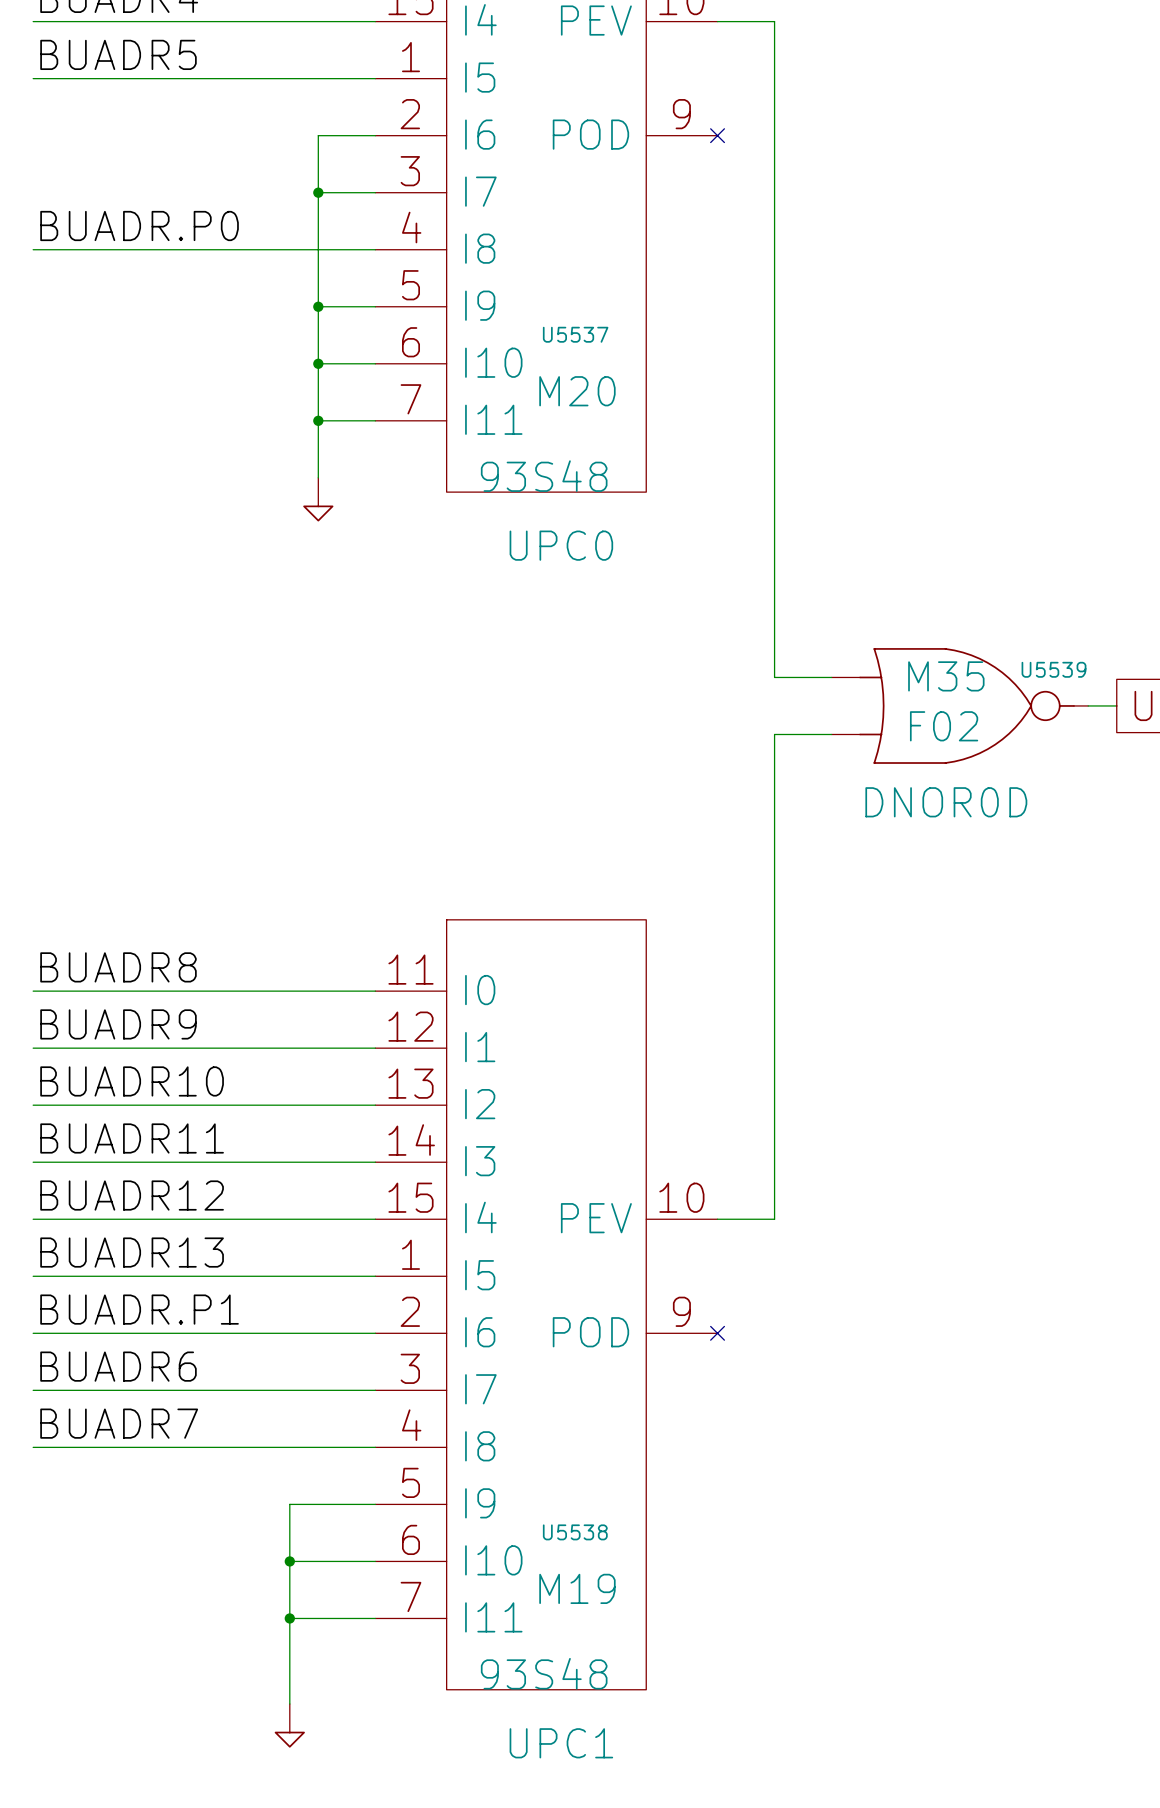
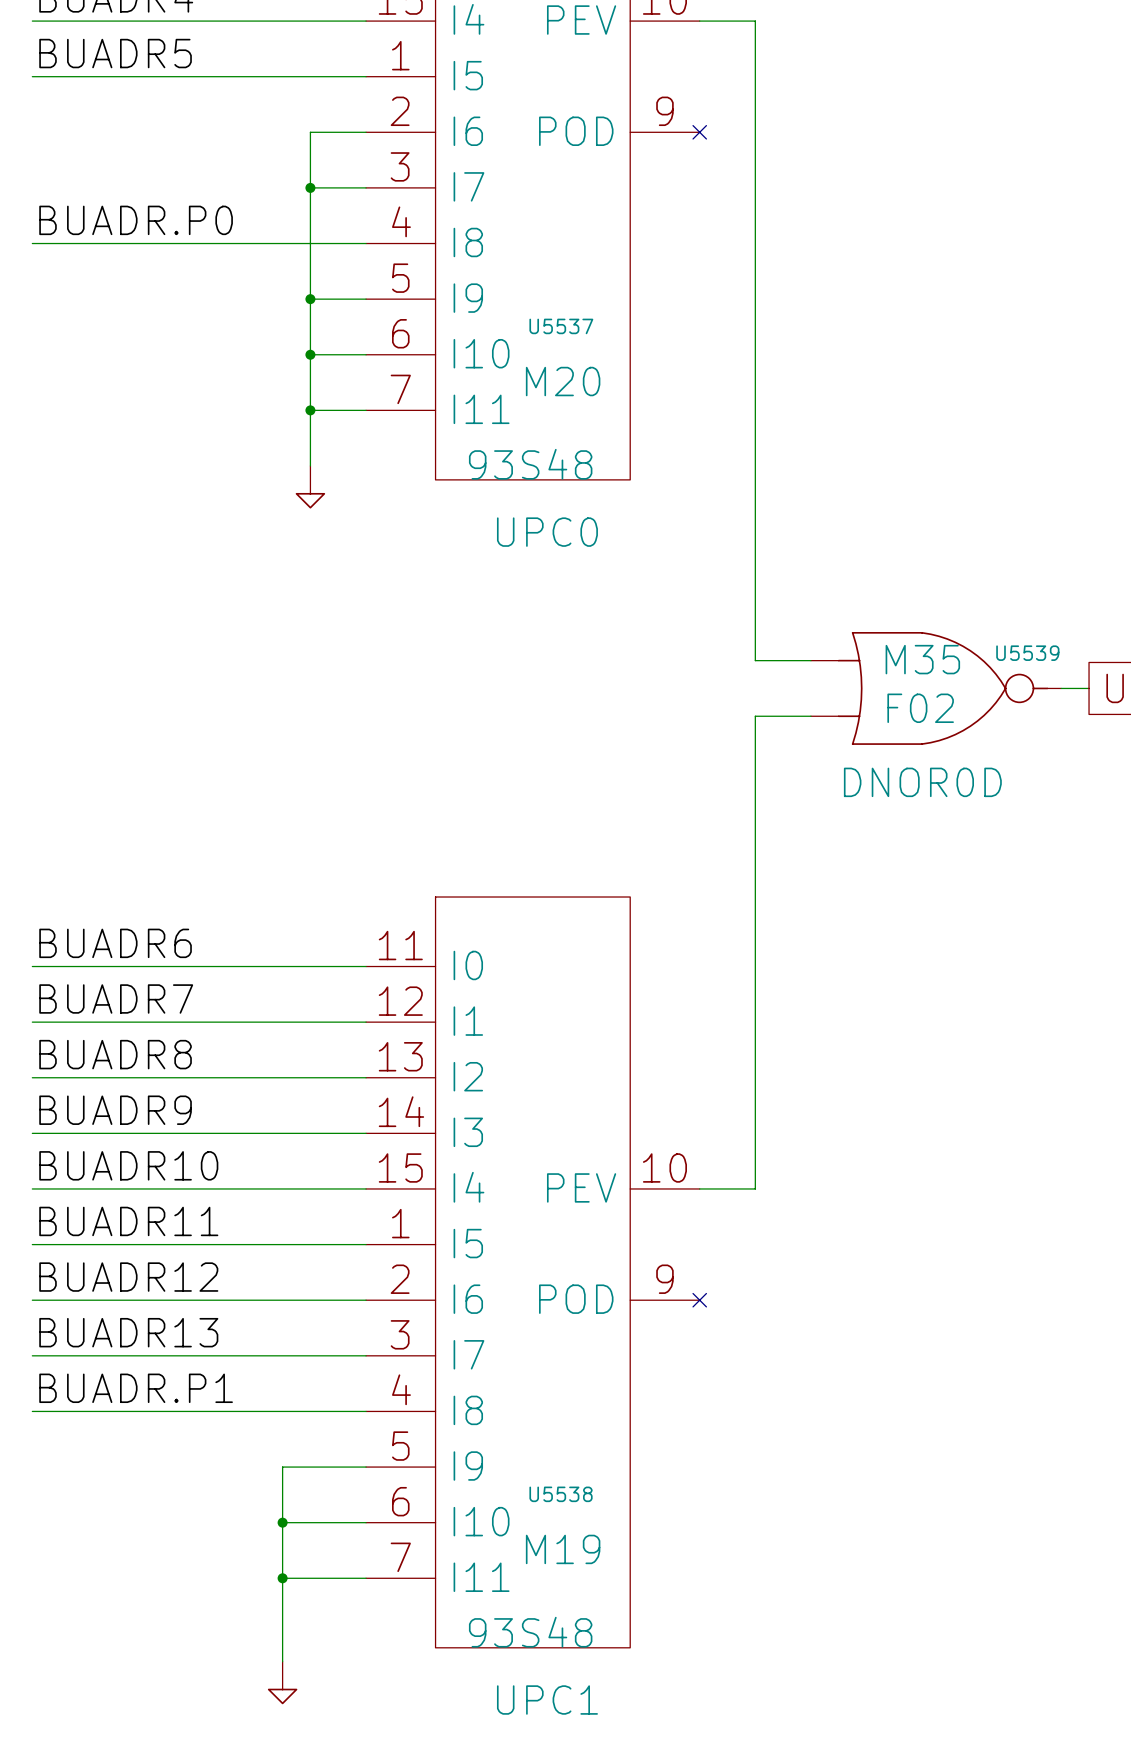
label: BUADR8 (118, 967) -> BUADR6 (115, 943)
label: BUADR9 (118, 1024) -> BUADR7 (116, 998)
label: BUADR10 (132, 1081) -> BUADR8 (115, 1054)
label: BUADR11 (132, 1138) -> BUADR9 (115, 1110)
label: BUADR12 (132, 1195) -> BUADR10 (128, 1165)
label: BUADR13 (132, 1252) -> BUADR11 (128, 1221)
label: BUADR.P1 (139, 1309) -> BUADR12 (128, 1277)
label: BUADR6 (118, 1366) -> BUADR13 (128, 1332)
label: BUADR7 (119, 1423) -> BUADR.P1 (136, 1388)

